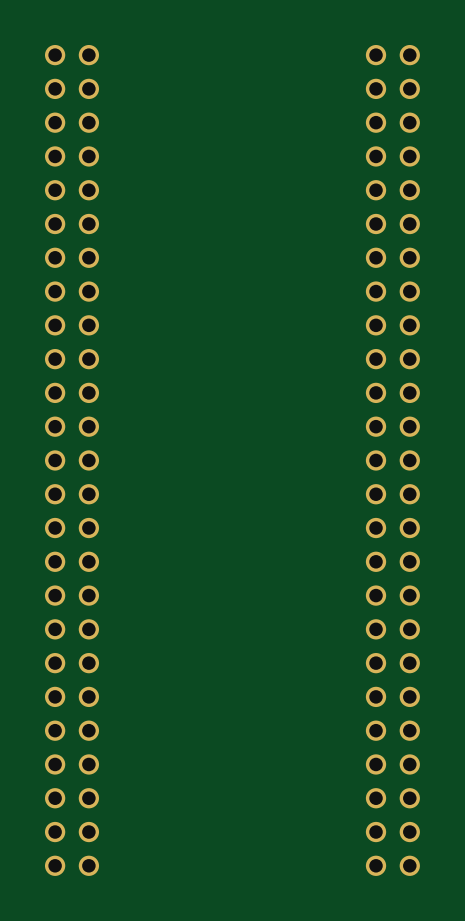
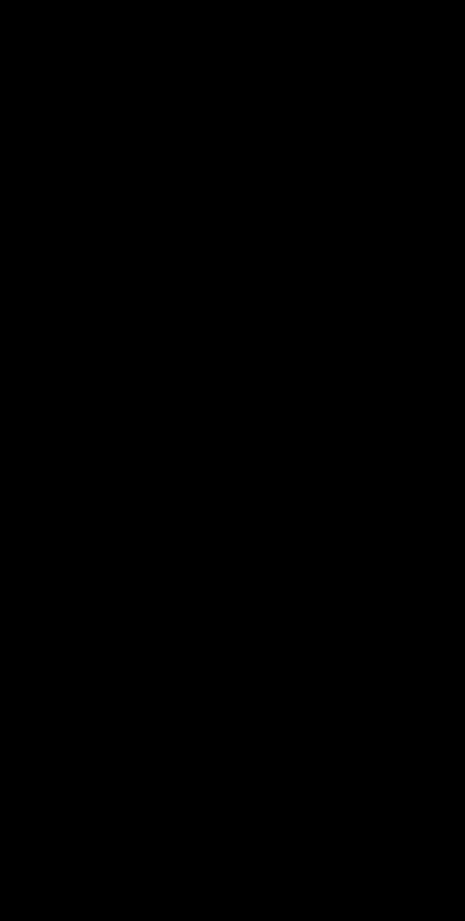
part: (72, 460) -> none
part: (392, 460) -> none

